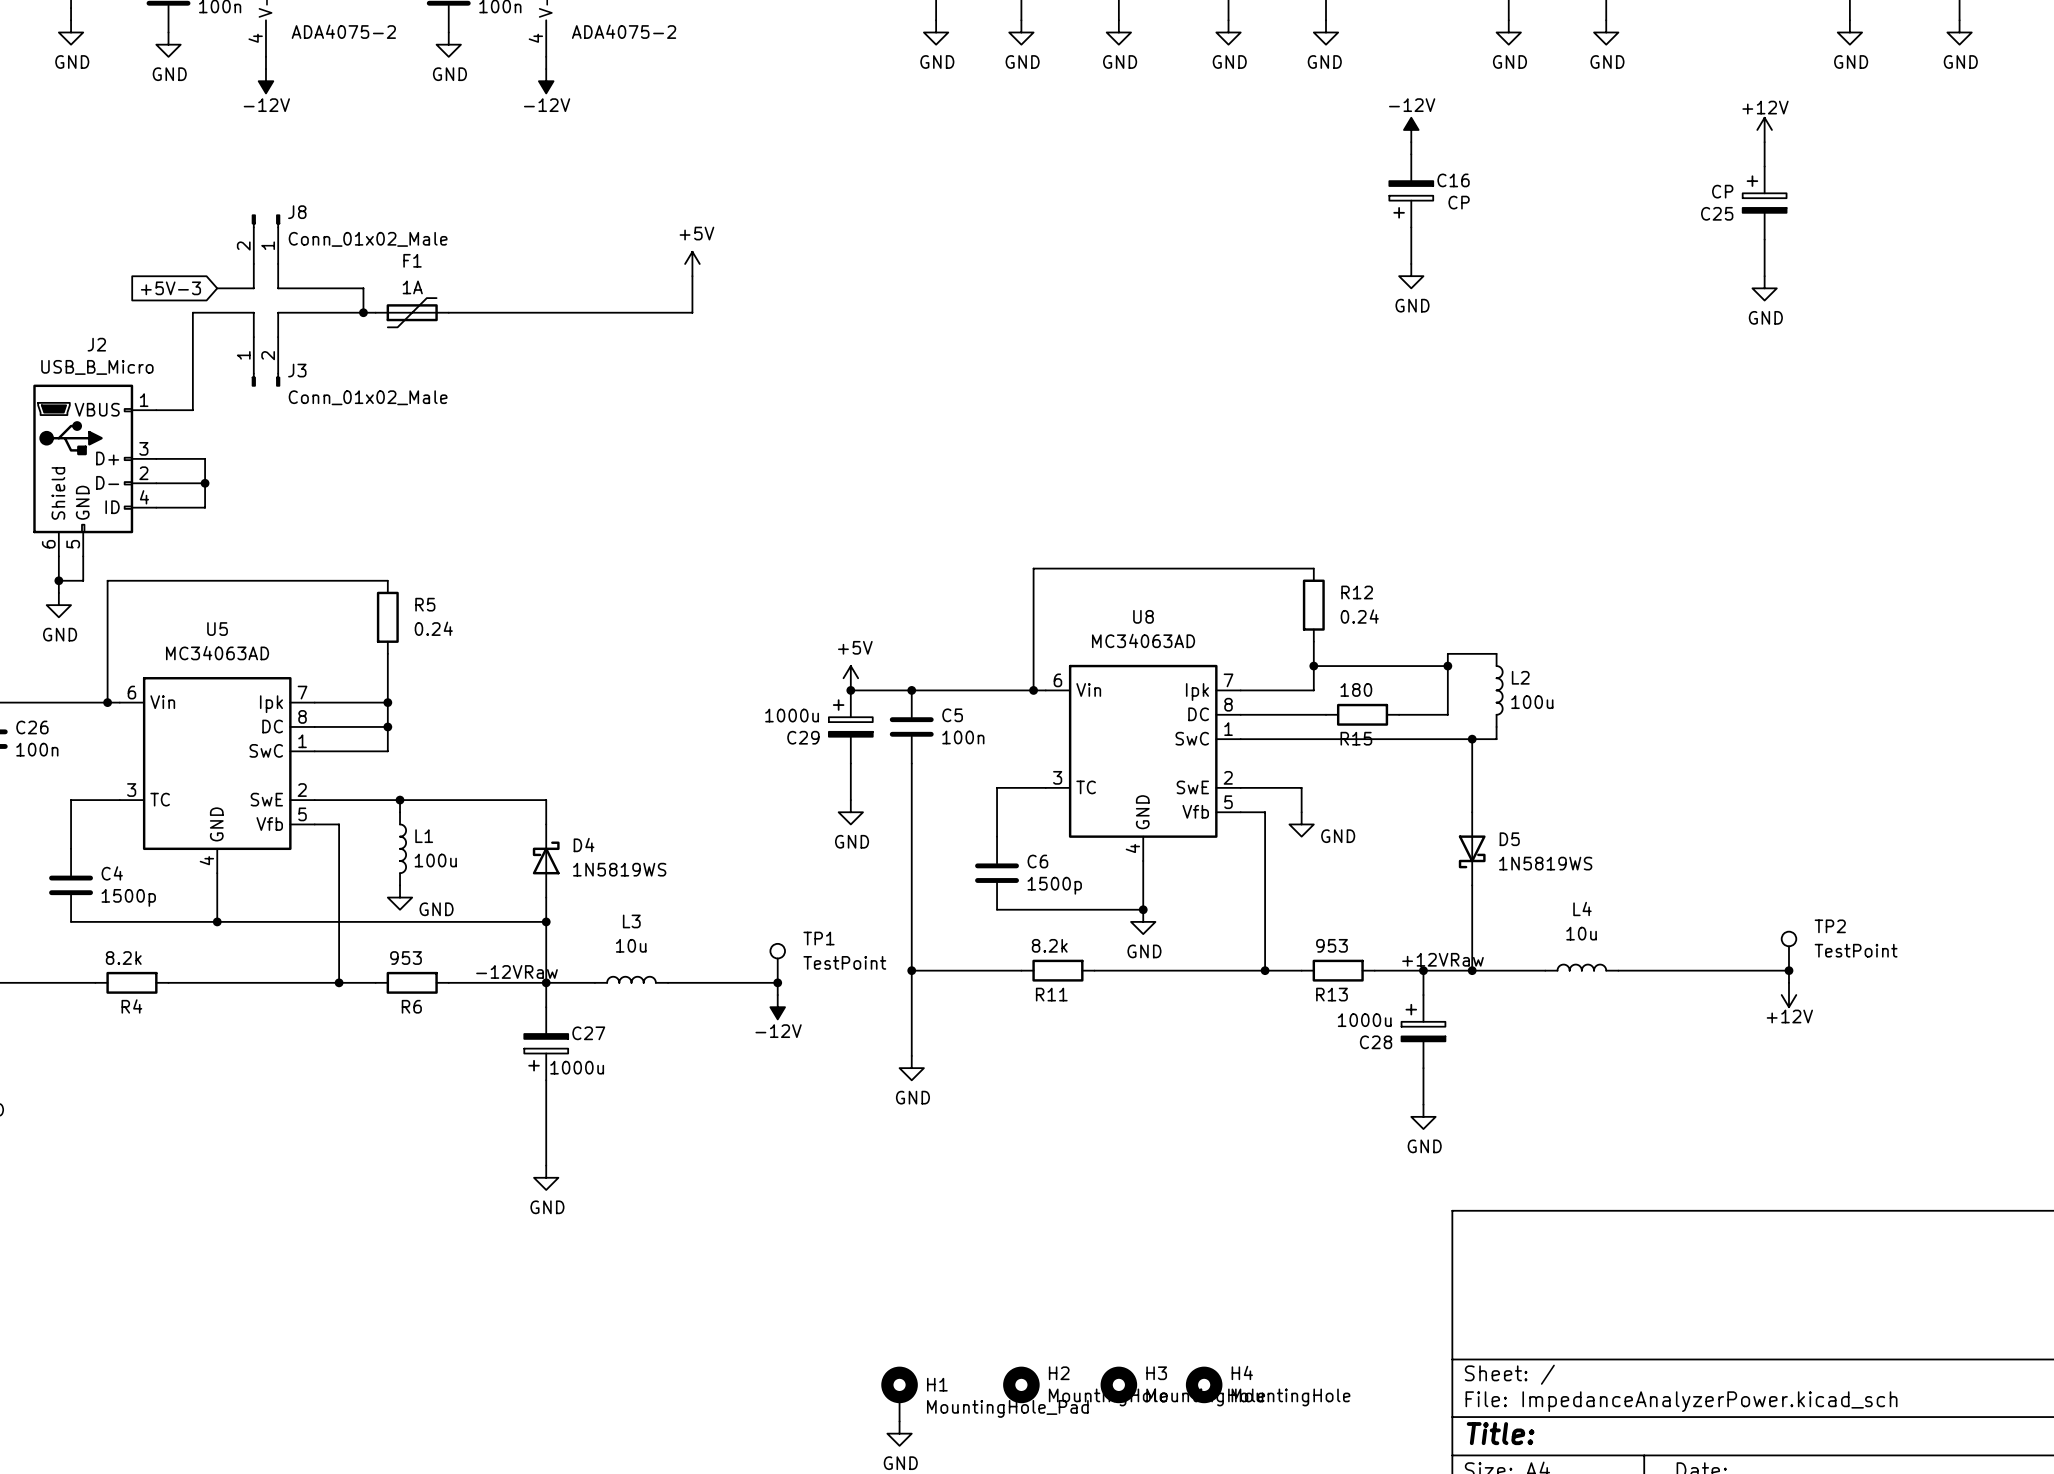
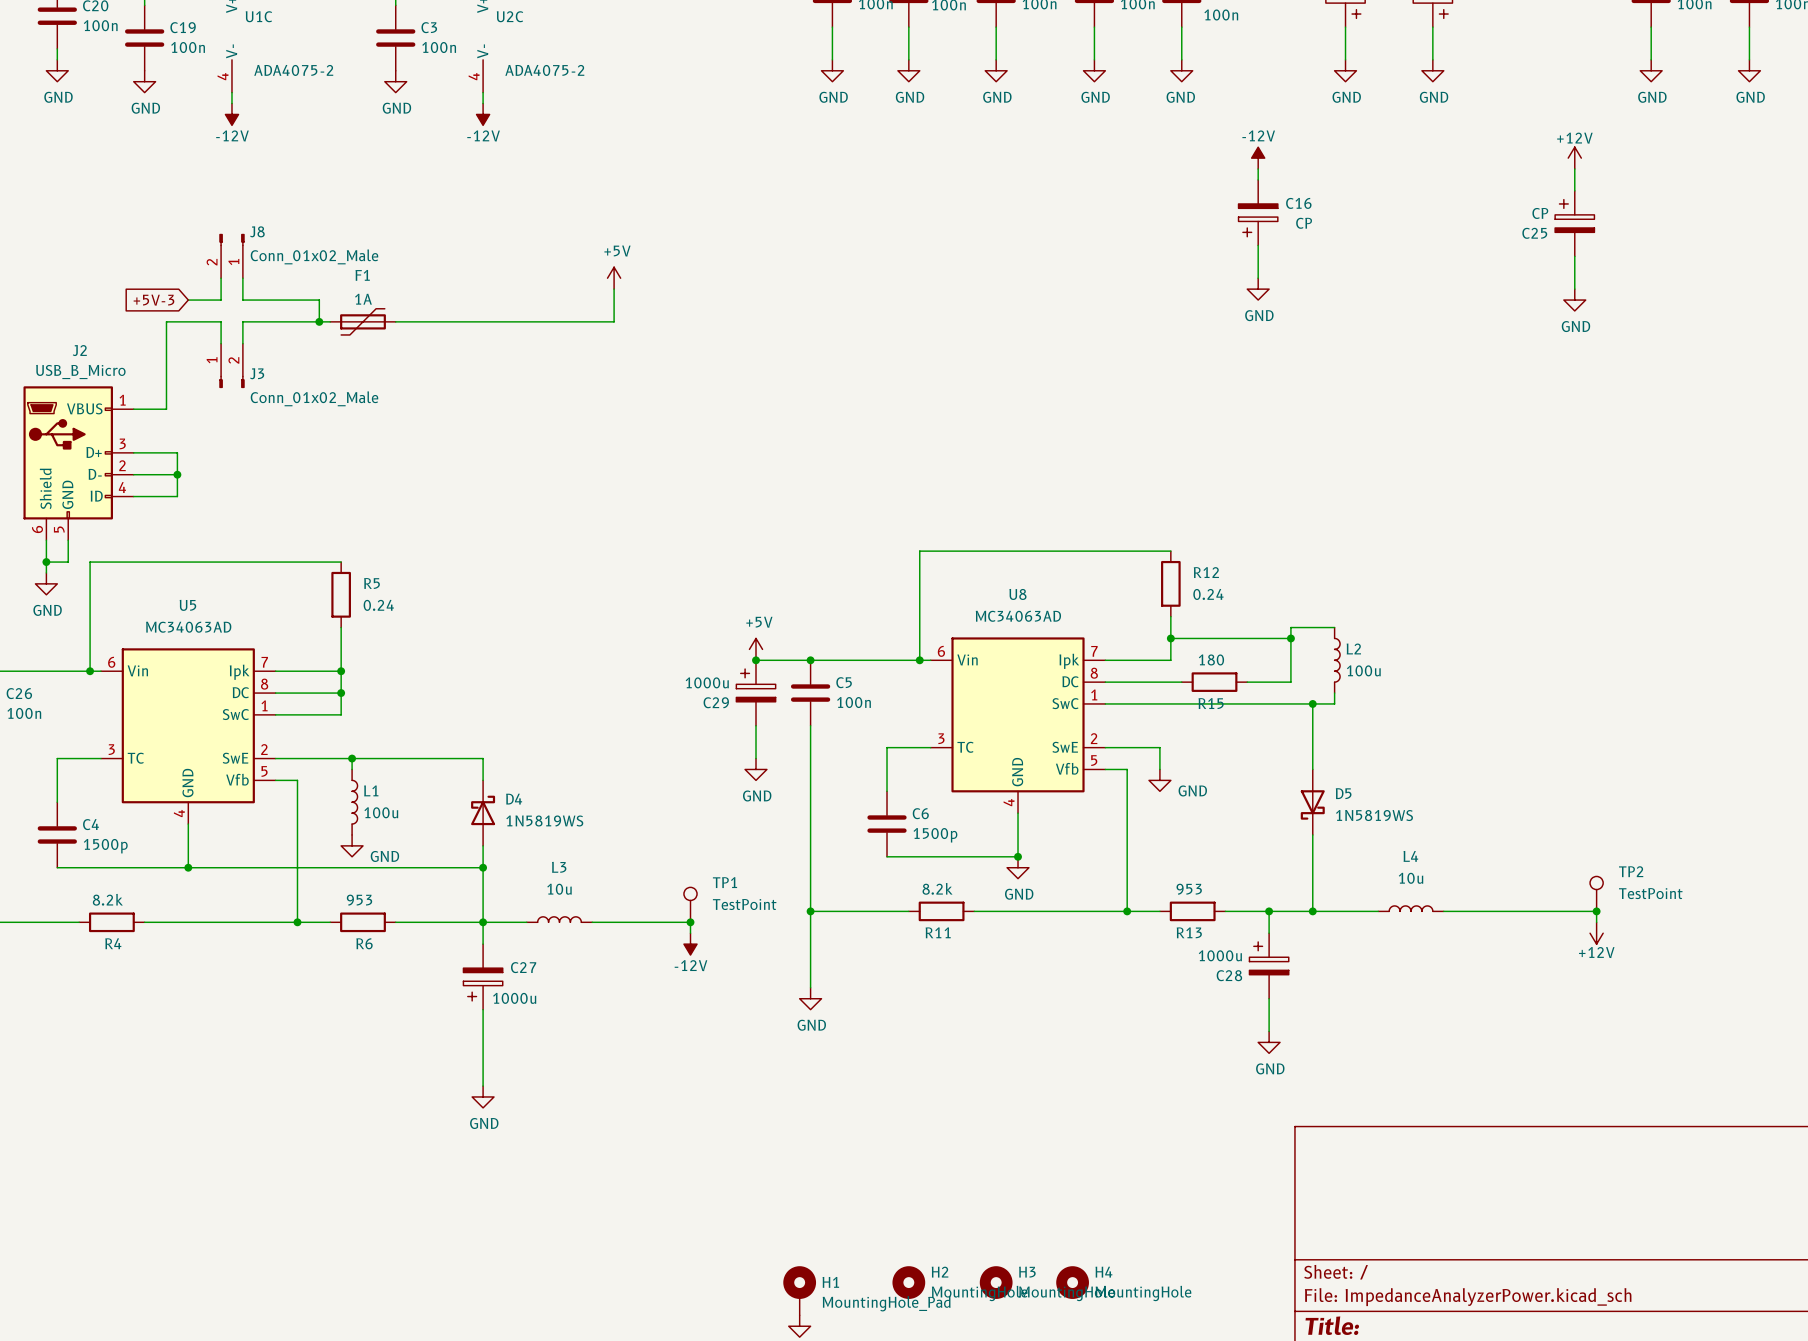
label: +12VRaw (1443, 959) -> none
label: -12VRaw (517, 971) -> none

